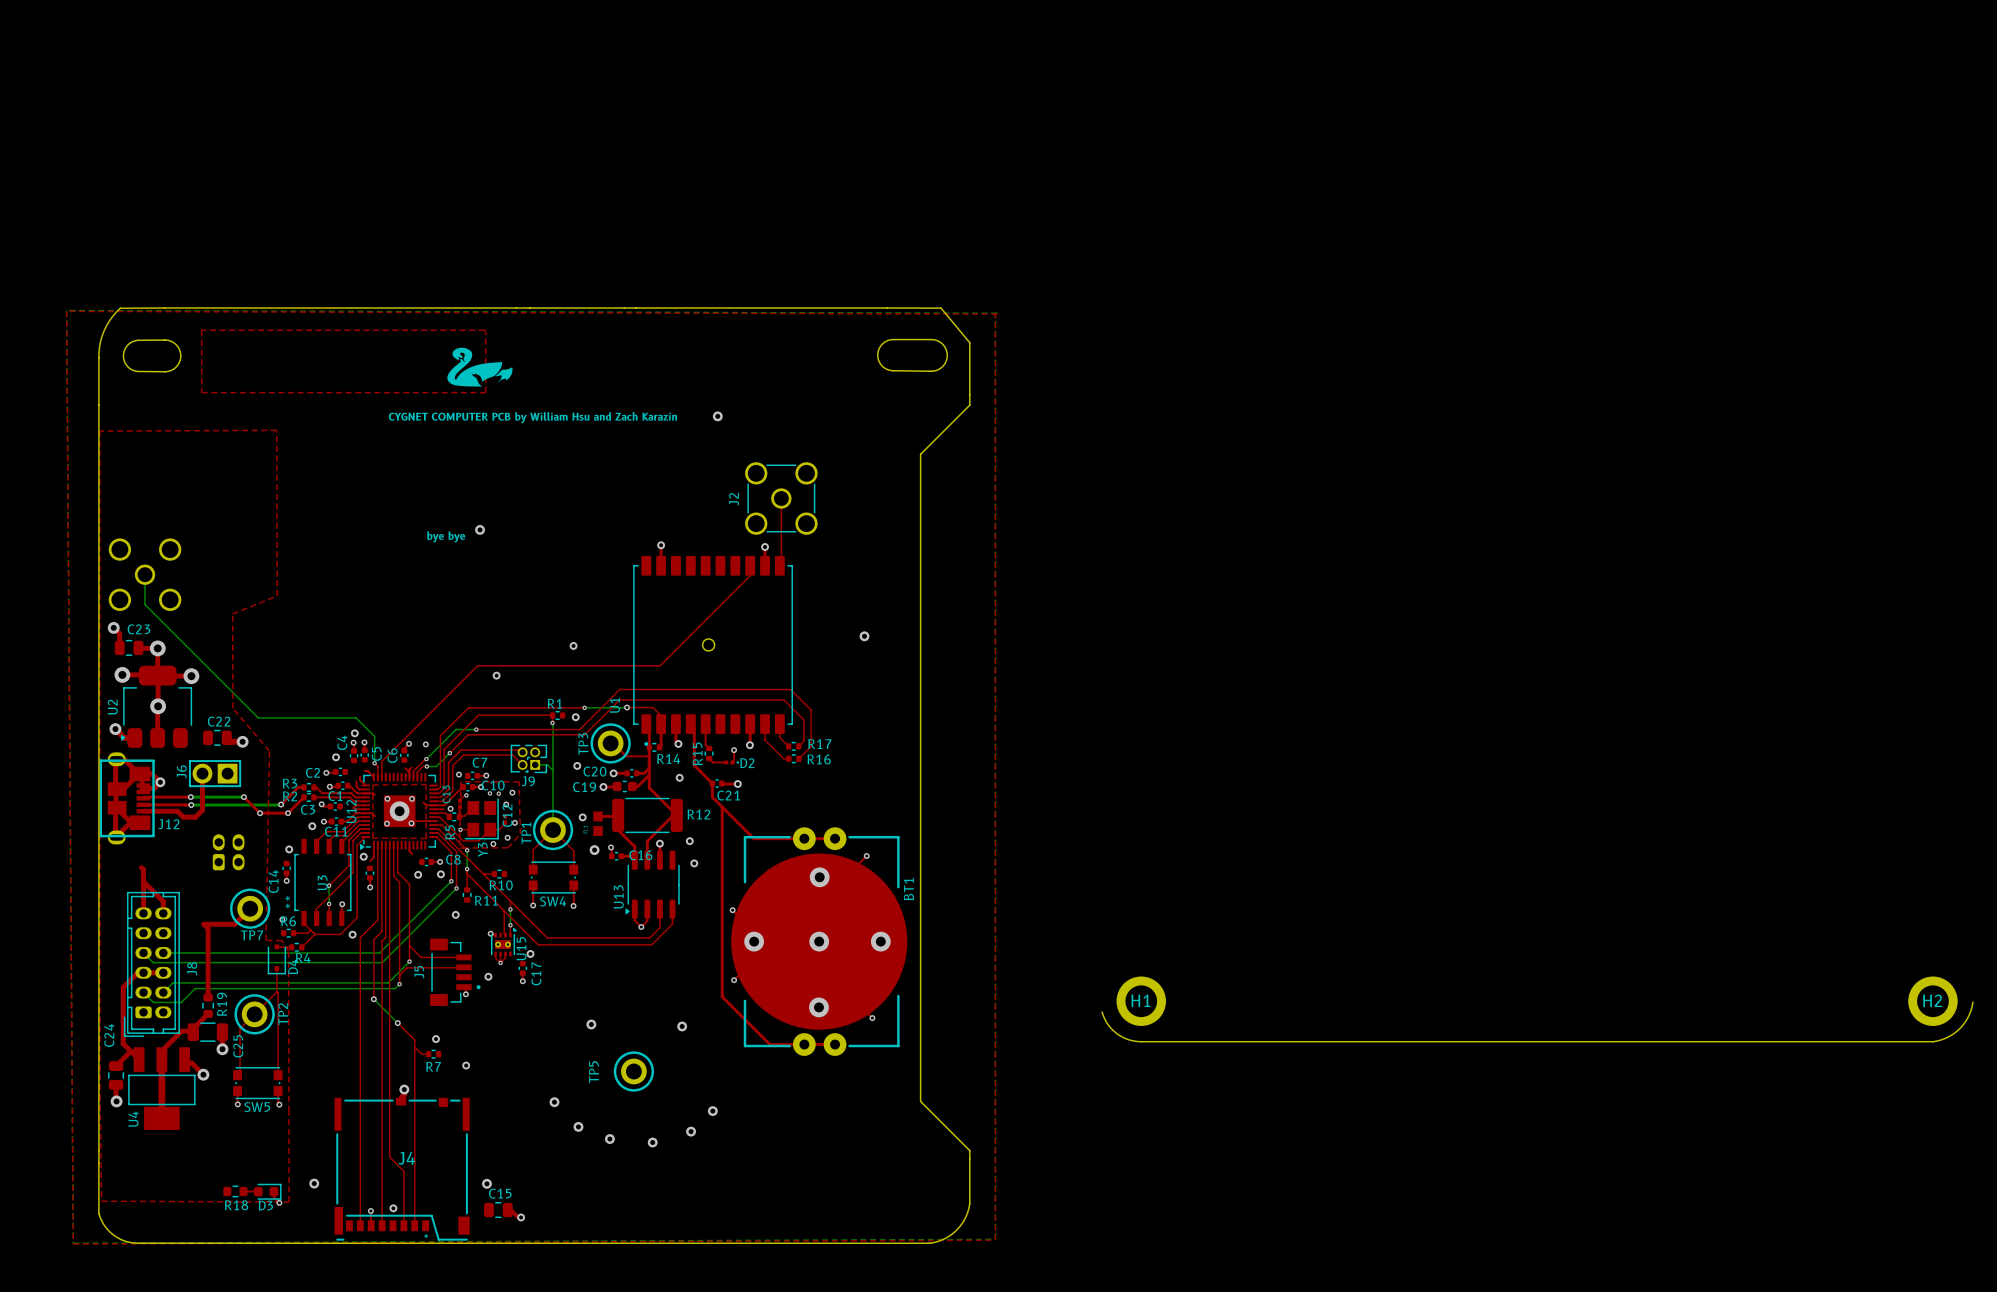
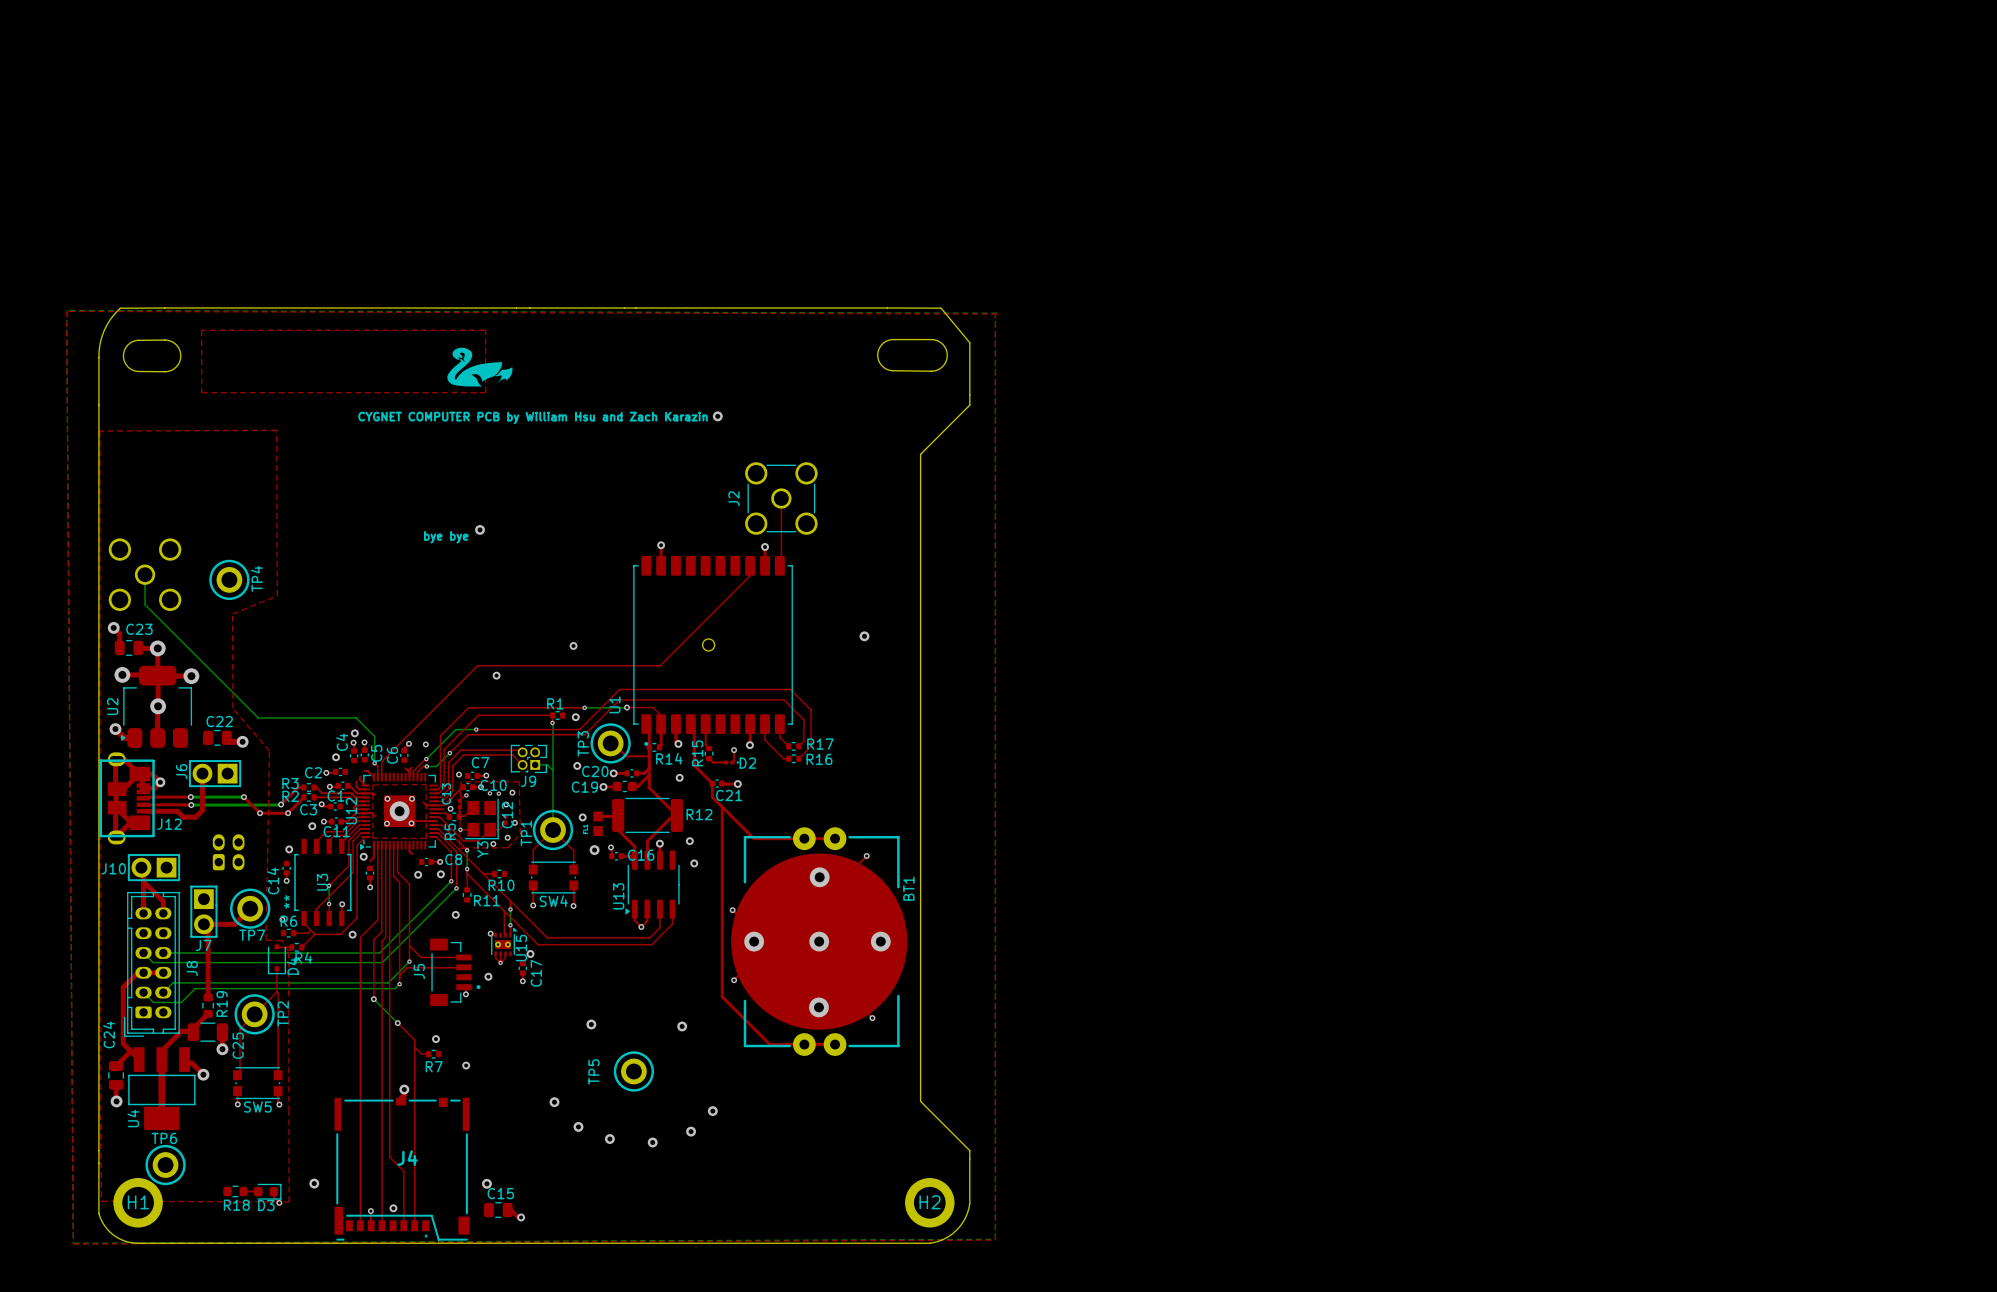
TP4: none -> (229, 579)
J10: none -> (153, 867)
J7: none -> (203, 911)
H1 position: (1141, 1001) -> (138, 1202)
H2 position: (1932, 1001) -> (929, 1202)
board edge: (1972, 1002) (1968, 1016) (1959, 1028) (1947, 1037) (1933, 1041) (1141, 1041) (1128, 1039) (1116, 1033) (1107, 1024) (1102, 1012) -> none
TP6: none -> (165, 1165)

